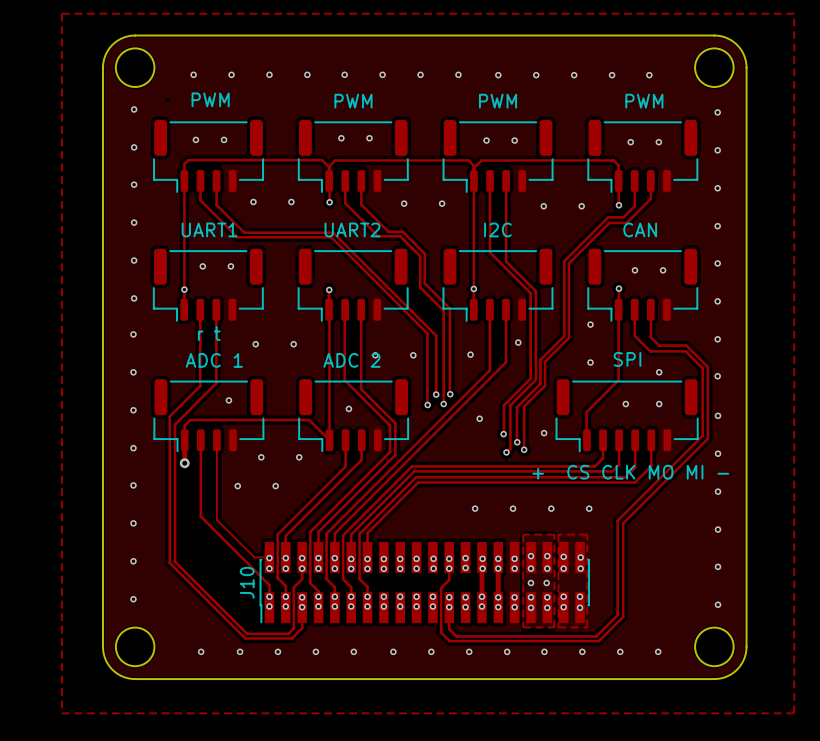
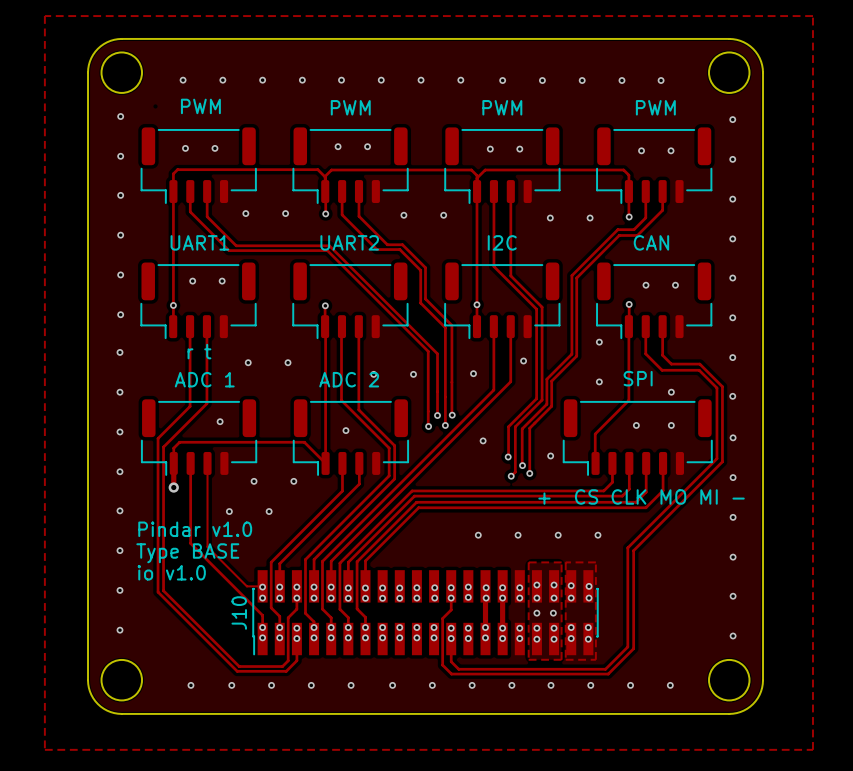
text: none -> Pindar v1.0 (195, 529)
text: none -> Type BASE (187, 553)
text: none -> io v1.0 (171, 572)

